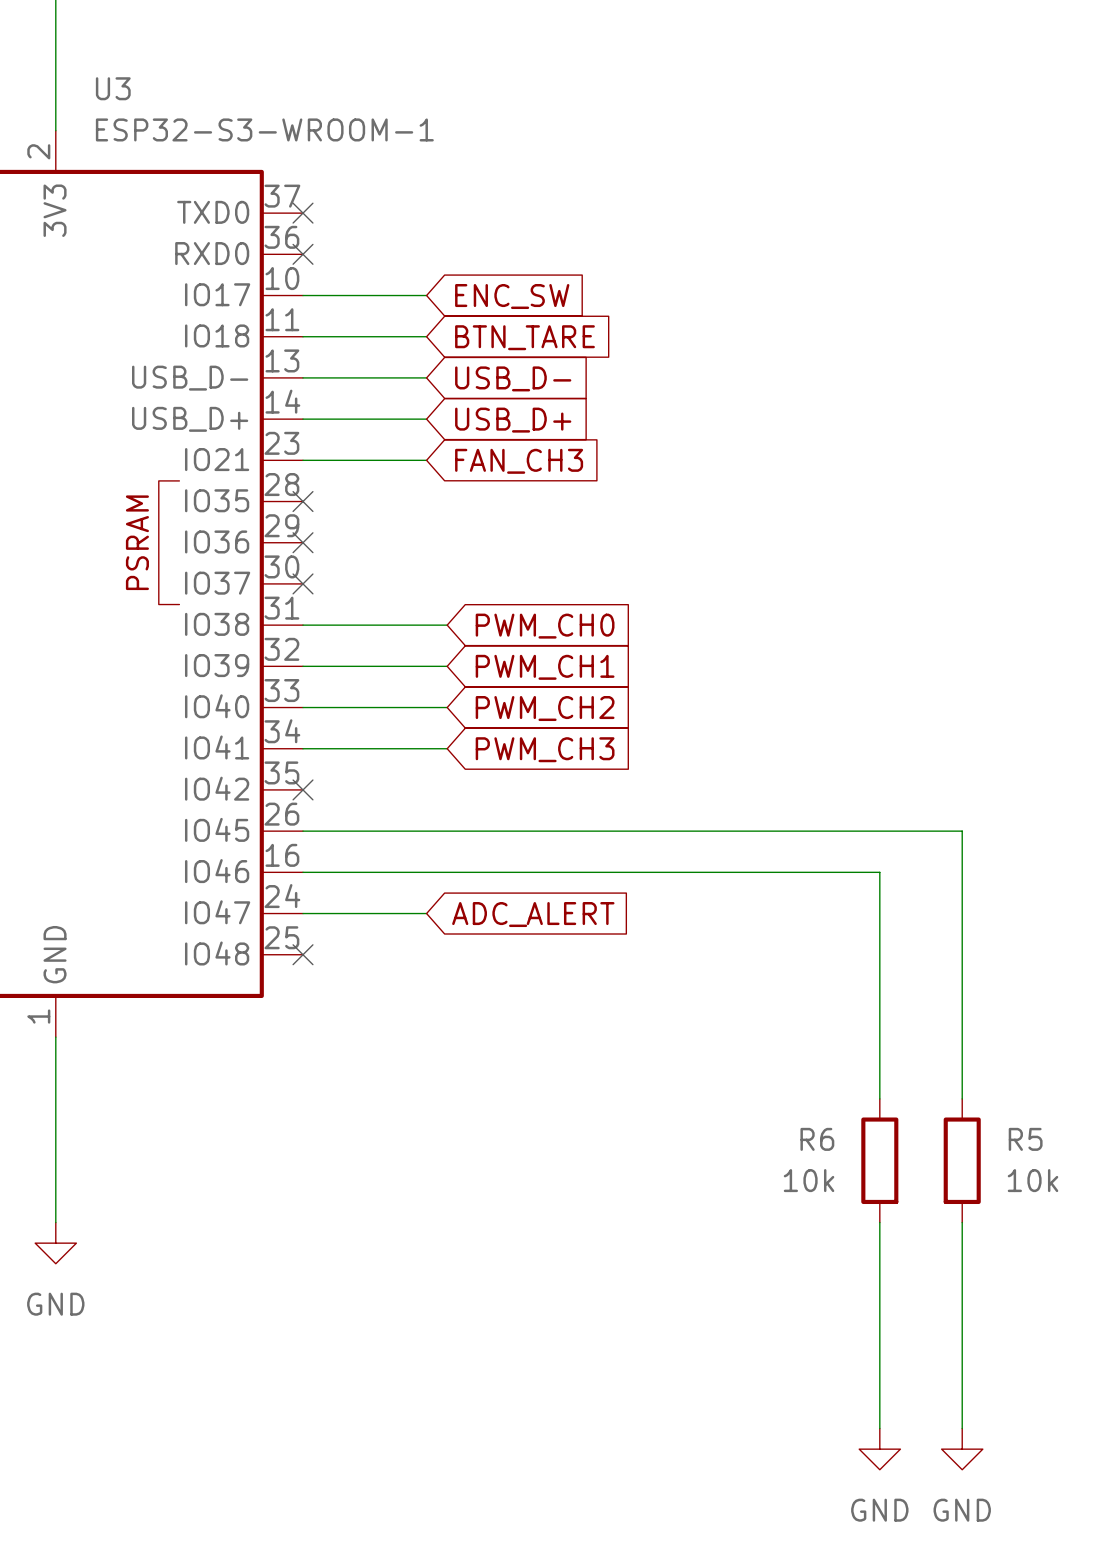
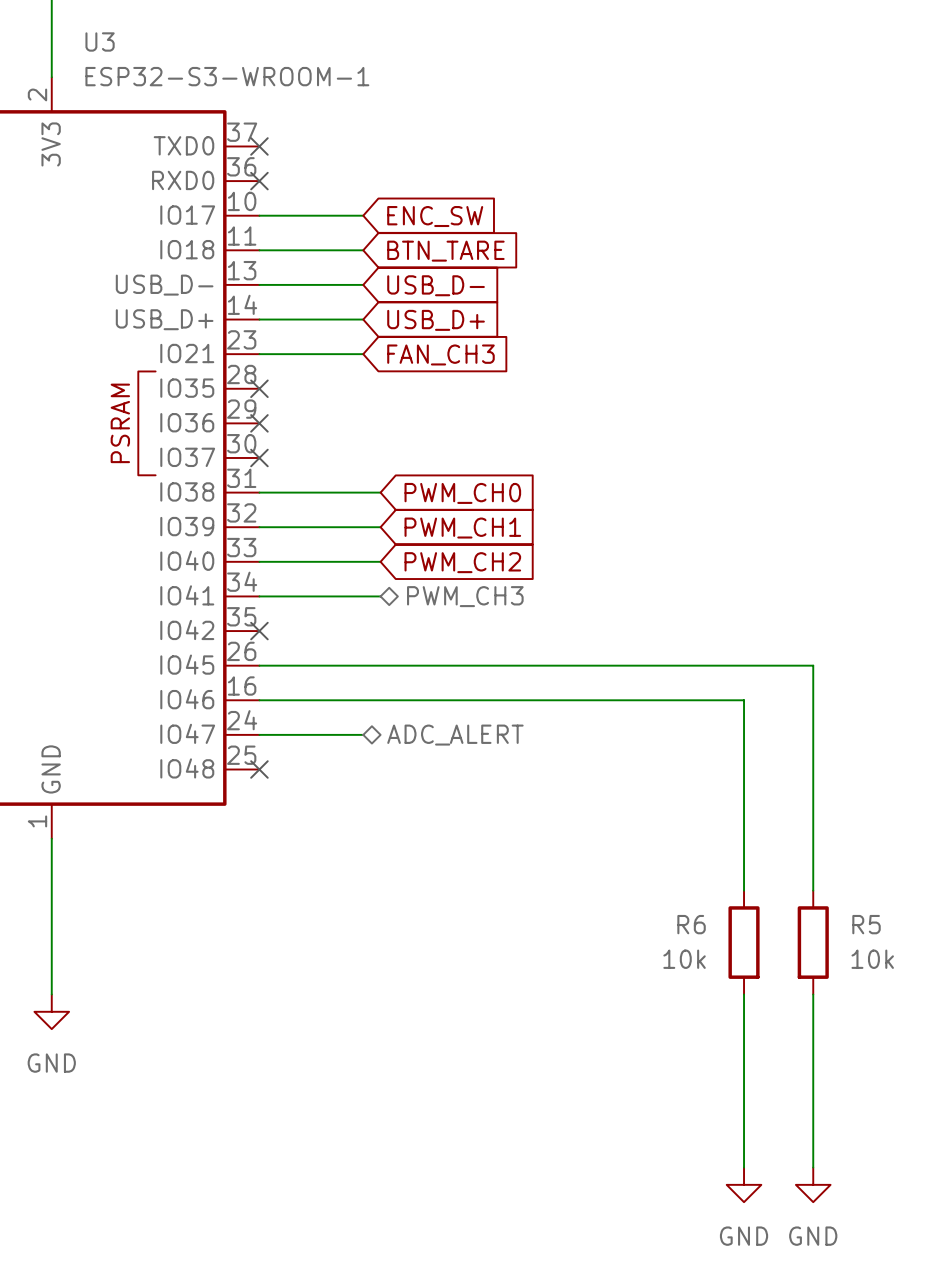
hierarchical label: none -> PWM_CH3 (465, 596)
global label: PWM_CH3 (545, 749) -> none
hierarchical label: none -> ADC_ALERT (455, 735)
global label: ADC_ALERT (533, 914) -> none

